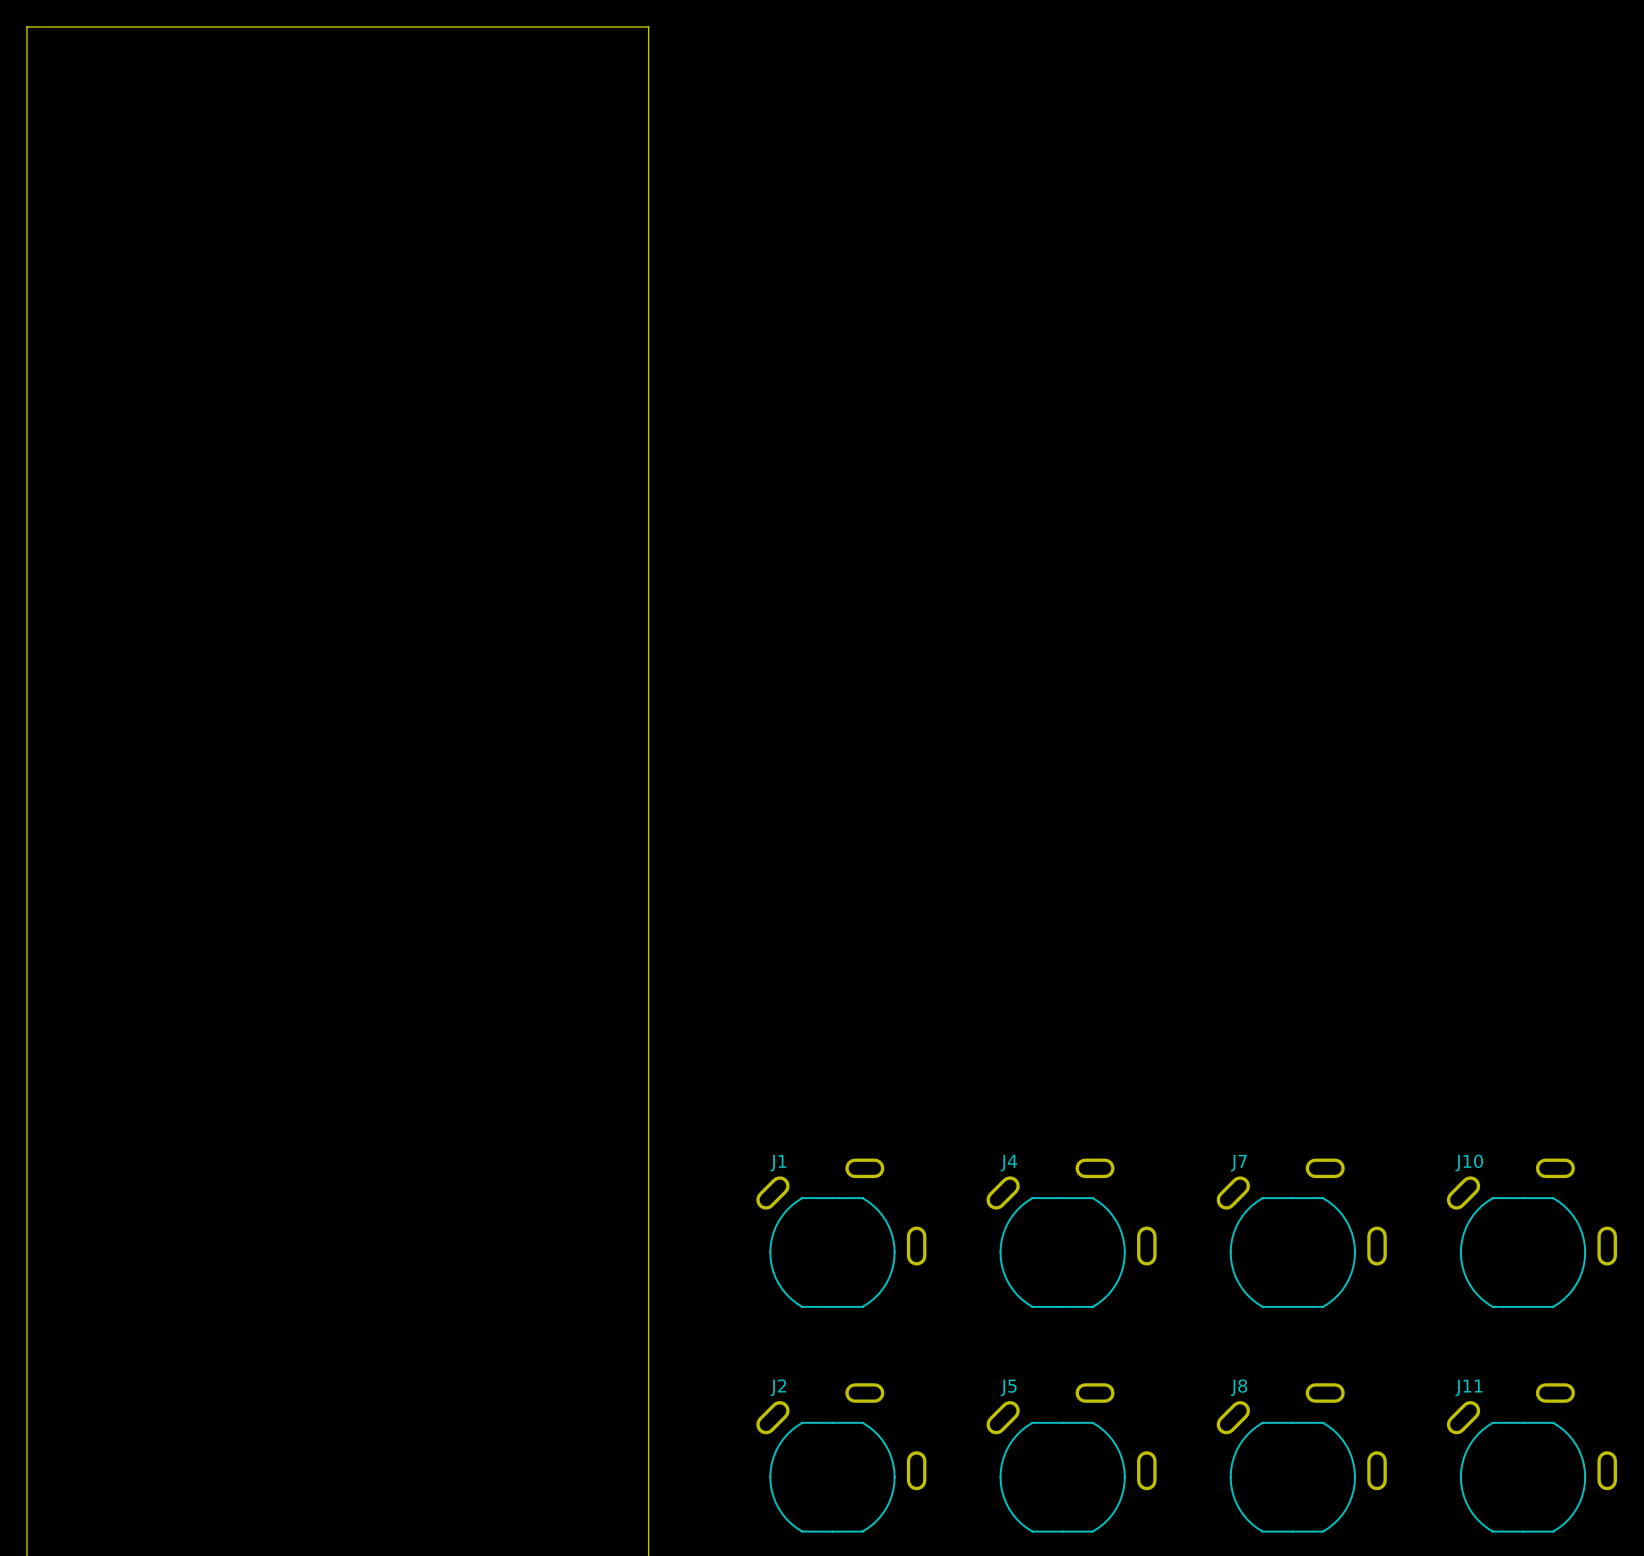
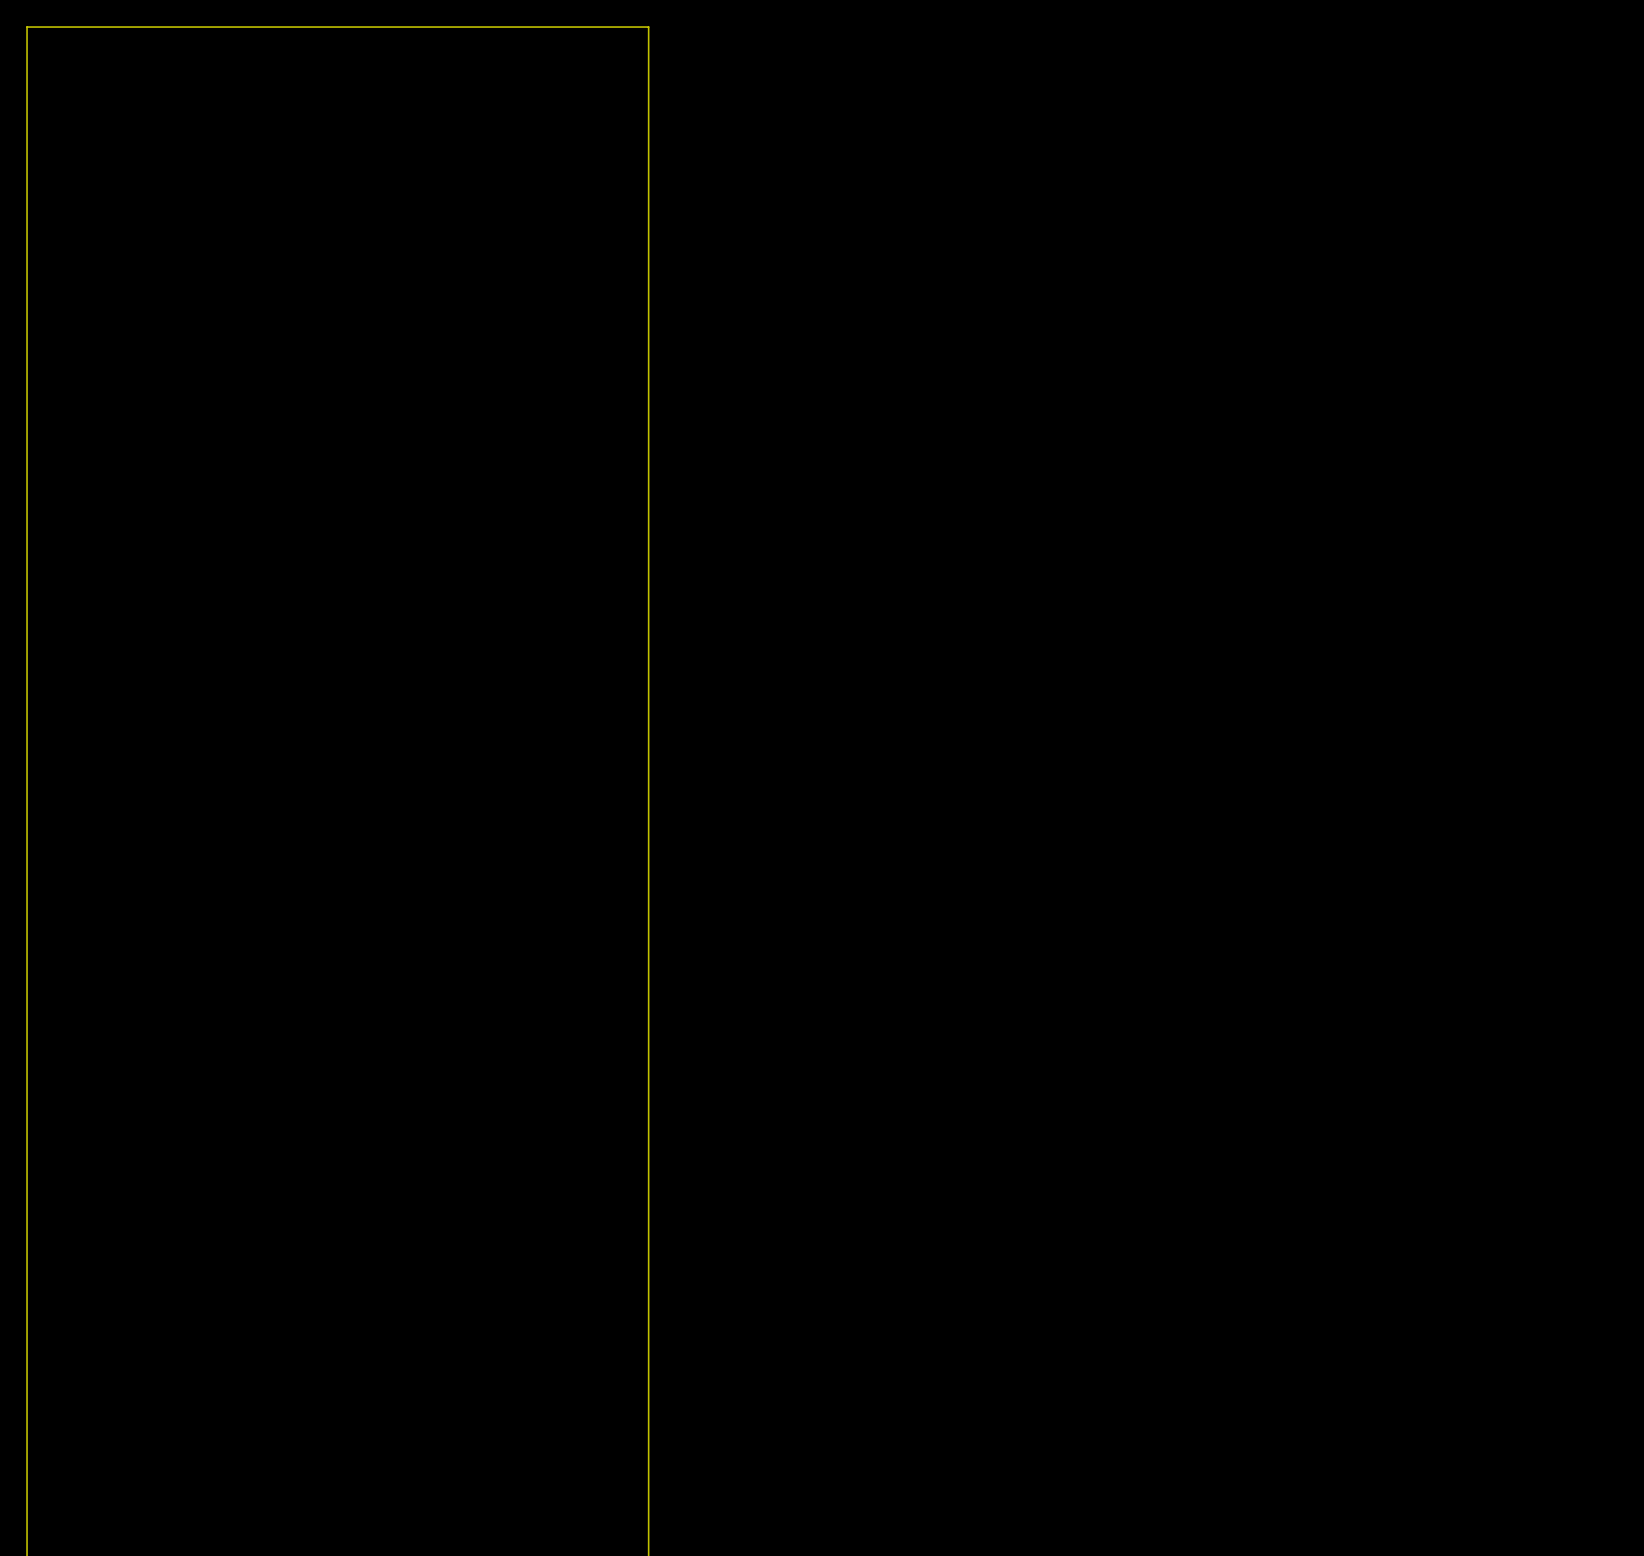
J1: (841, 1233) -> none
J4: (1071, 1233) -> none
J7: (1301, 1233) -> none
J10: (1531, 1233) -> none
J2: (841, 1457) -> none
J5: (1071, 1457) -> none
J8: (1301, 1457) -> none
J11: (1531, 1457) -> none

